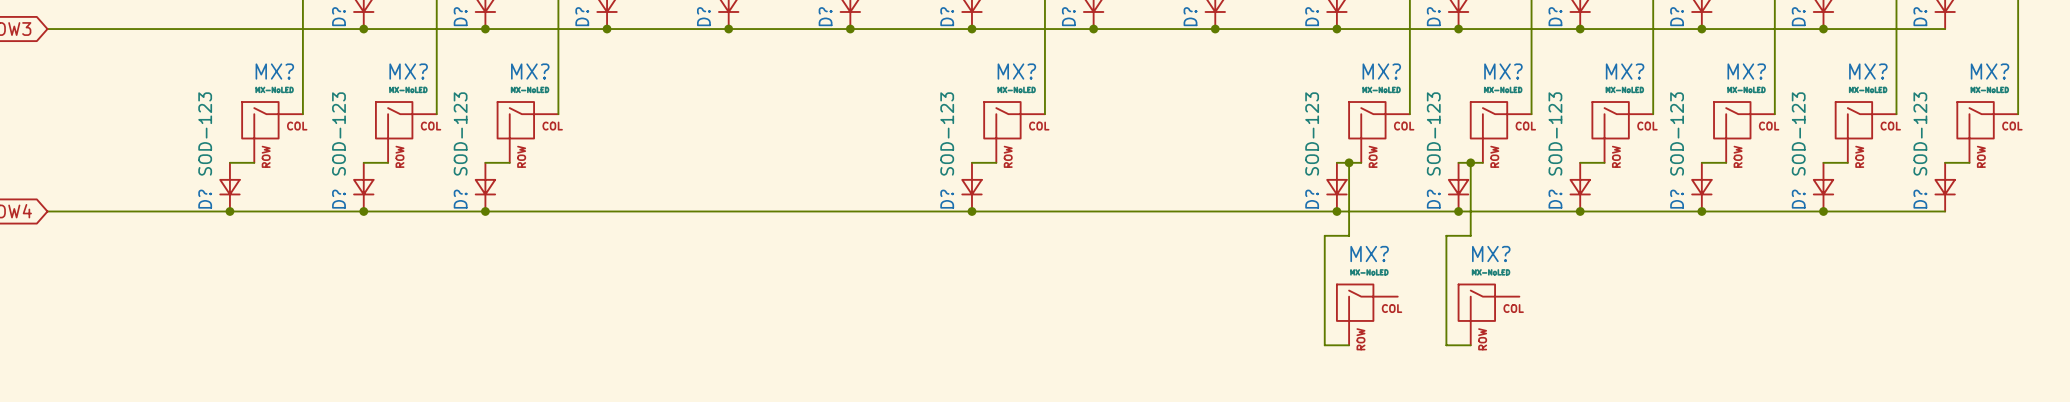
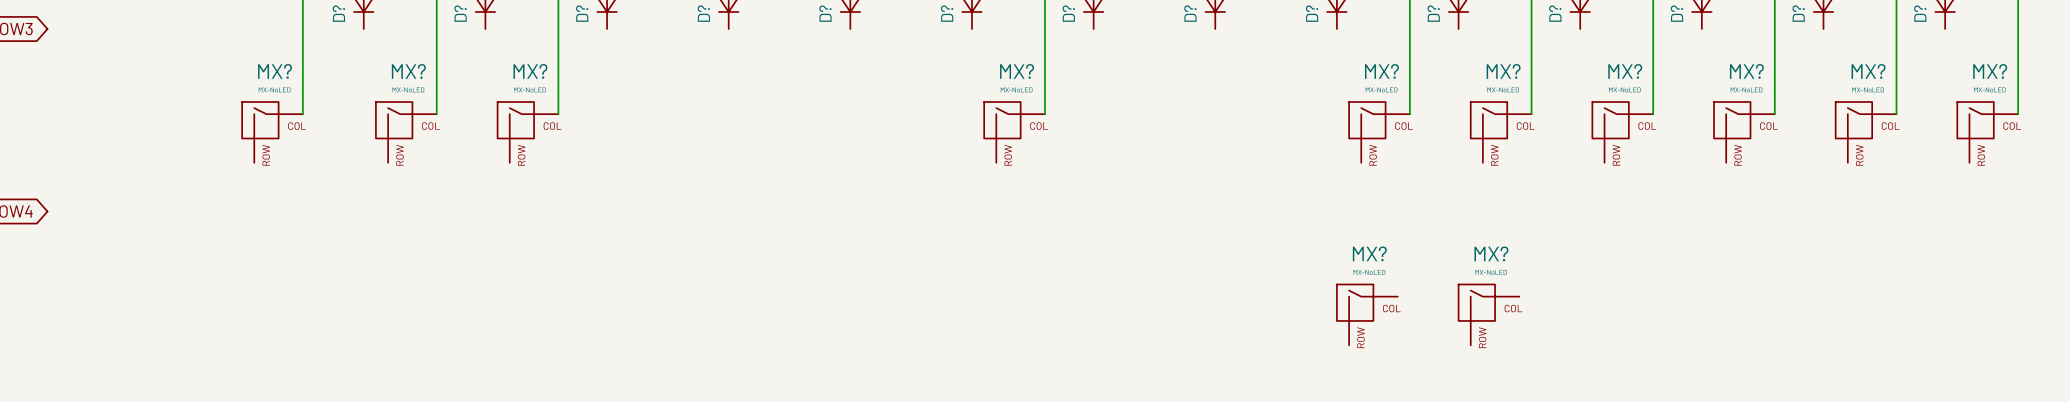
wire: (47, 29) (1945, 29) -> none
junction: (363, 29) -> none
junction: (485, 29) -> none
junction: (607, 29) -> none
junction: (728, 29) -> none
junction: (850, 29) -> none
junction: (971, 29) -> none
junction: (1093, 29) -> none
junction: (1215, 29) -> none
junction: (1336, 29) -> none
junction: (1458, 29) -> none
junction: (1580, 29) -> none
junction: (1701, 29) -> none
junction: (1823, 29) -> none
wire: (229, 162) (254, 162) -> none
wire: (363, 162) (388, 162) -> none
wire: (485, 162) (509, 162) -> none
wire: (971, 162) (996, 162) -> none
wire: (1336, 162) (1361, 162) -> none
wire: (1349, 162) (1349, 235) (1324, 235) (1324, 345) (1349, 345) -> none
junction: (1349, 162) -> none
wire: (1458, 162) (1482, 162) -> none
wire: (1470, 162) (1470, 235) (1446, 235) (1446, 345) (1470, 345) -> none
junction: (1470, 162) -> none
wire: (1580, 162) (1604, 162) -> none
wire: (1701, 162) (1726, 162) -> none
wire: (1823, 162) (1847, 162) -> none
wire: (1945, 162) (1969, 162) -> none
D?: SOD-123 (229, 187) -> none
D?: SOD-123 (363, 187) -> none
D?: SOD-123 (485, 187) -> none
D?: SOD-123 (971, 187) -> none
D?: SOD-123 (1336, 187) -> none
D?: SOD-123 (1458, 187) -> none
D?: SOD-123 (1580, 187) -> none
D?: SOD-123 (1701, 187) -> none
D?: SOD-123 (1823, 187) -> none
D?: SOD-123 (1945, 187) -> none
wire: (47, 211) (1945, 211) -> none
junction: (229, 211) -> none
junction: (363, 211) -> none
junction: (485, 211) -> none
junction: (971, 211) -> none
junction: (1336, 211) -> none
junction: (1458, 211) -> none
junction: (1580, 211) -> none
junction: (1701, 211) -> none
junction: (1823, 211) -> none

